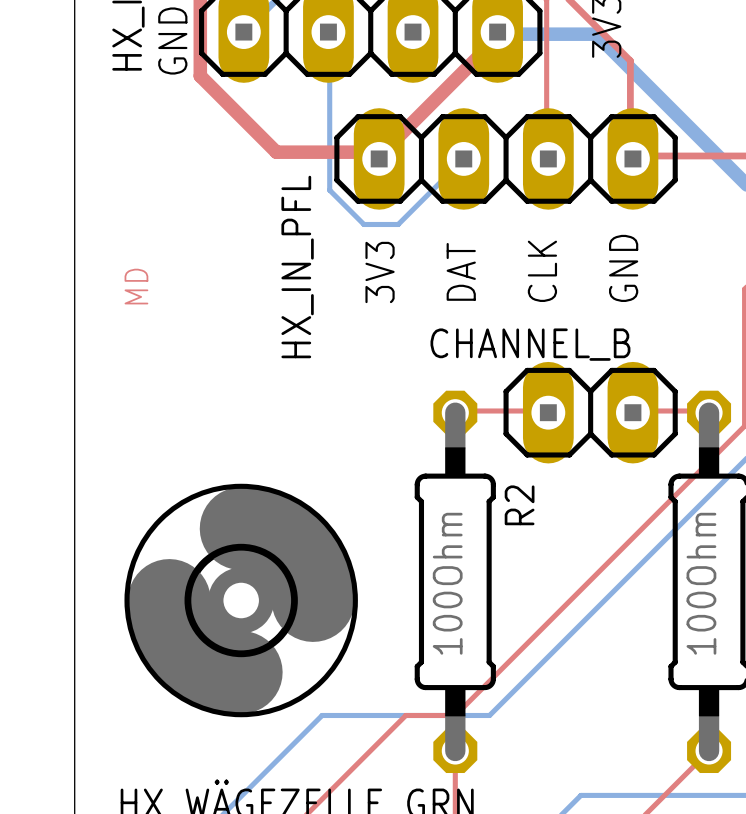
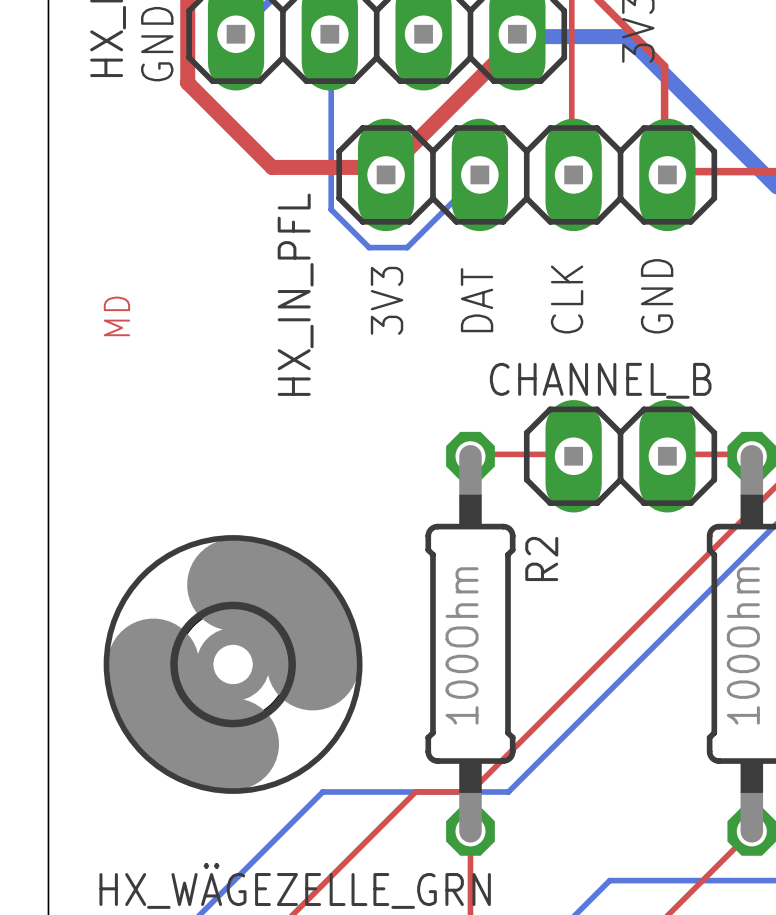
CHANNEL_B name position: CHANNEL_B (530, 344) -> CHANNEL_B (600, 380)

